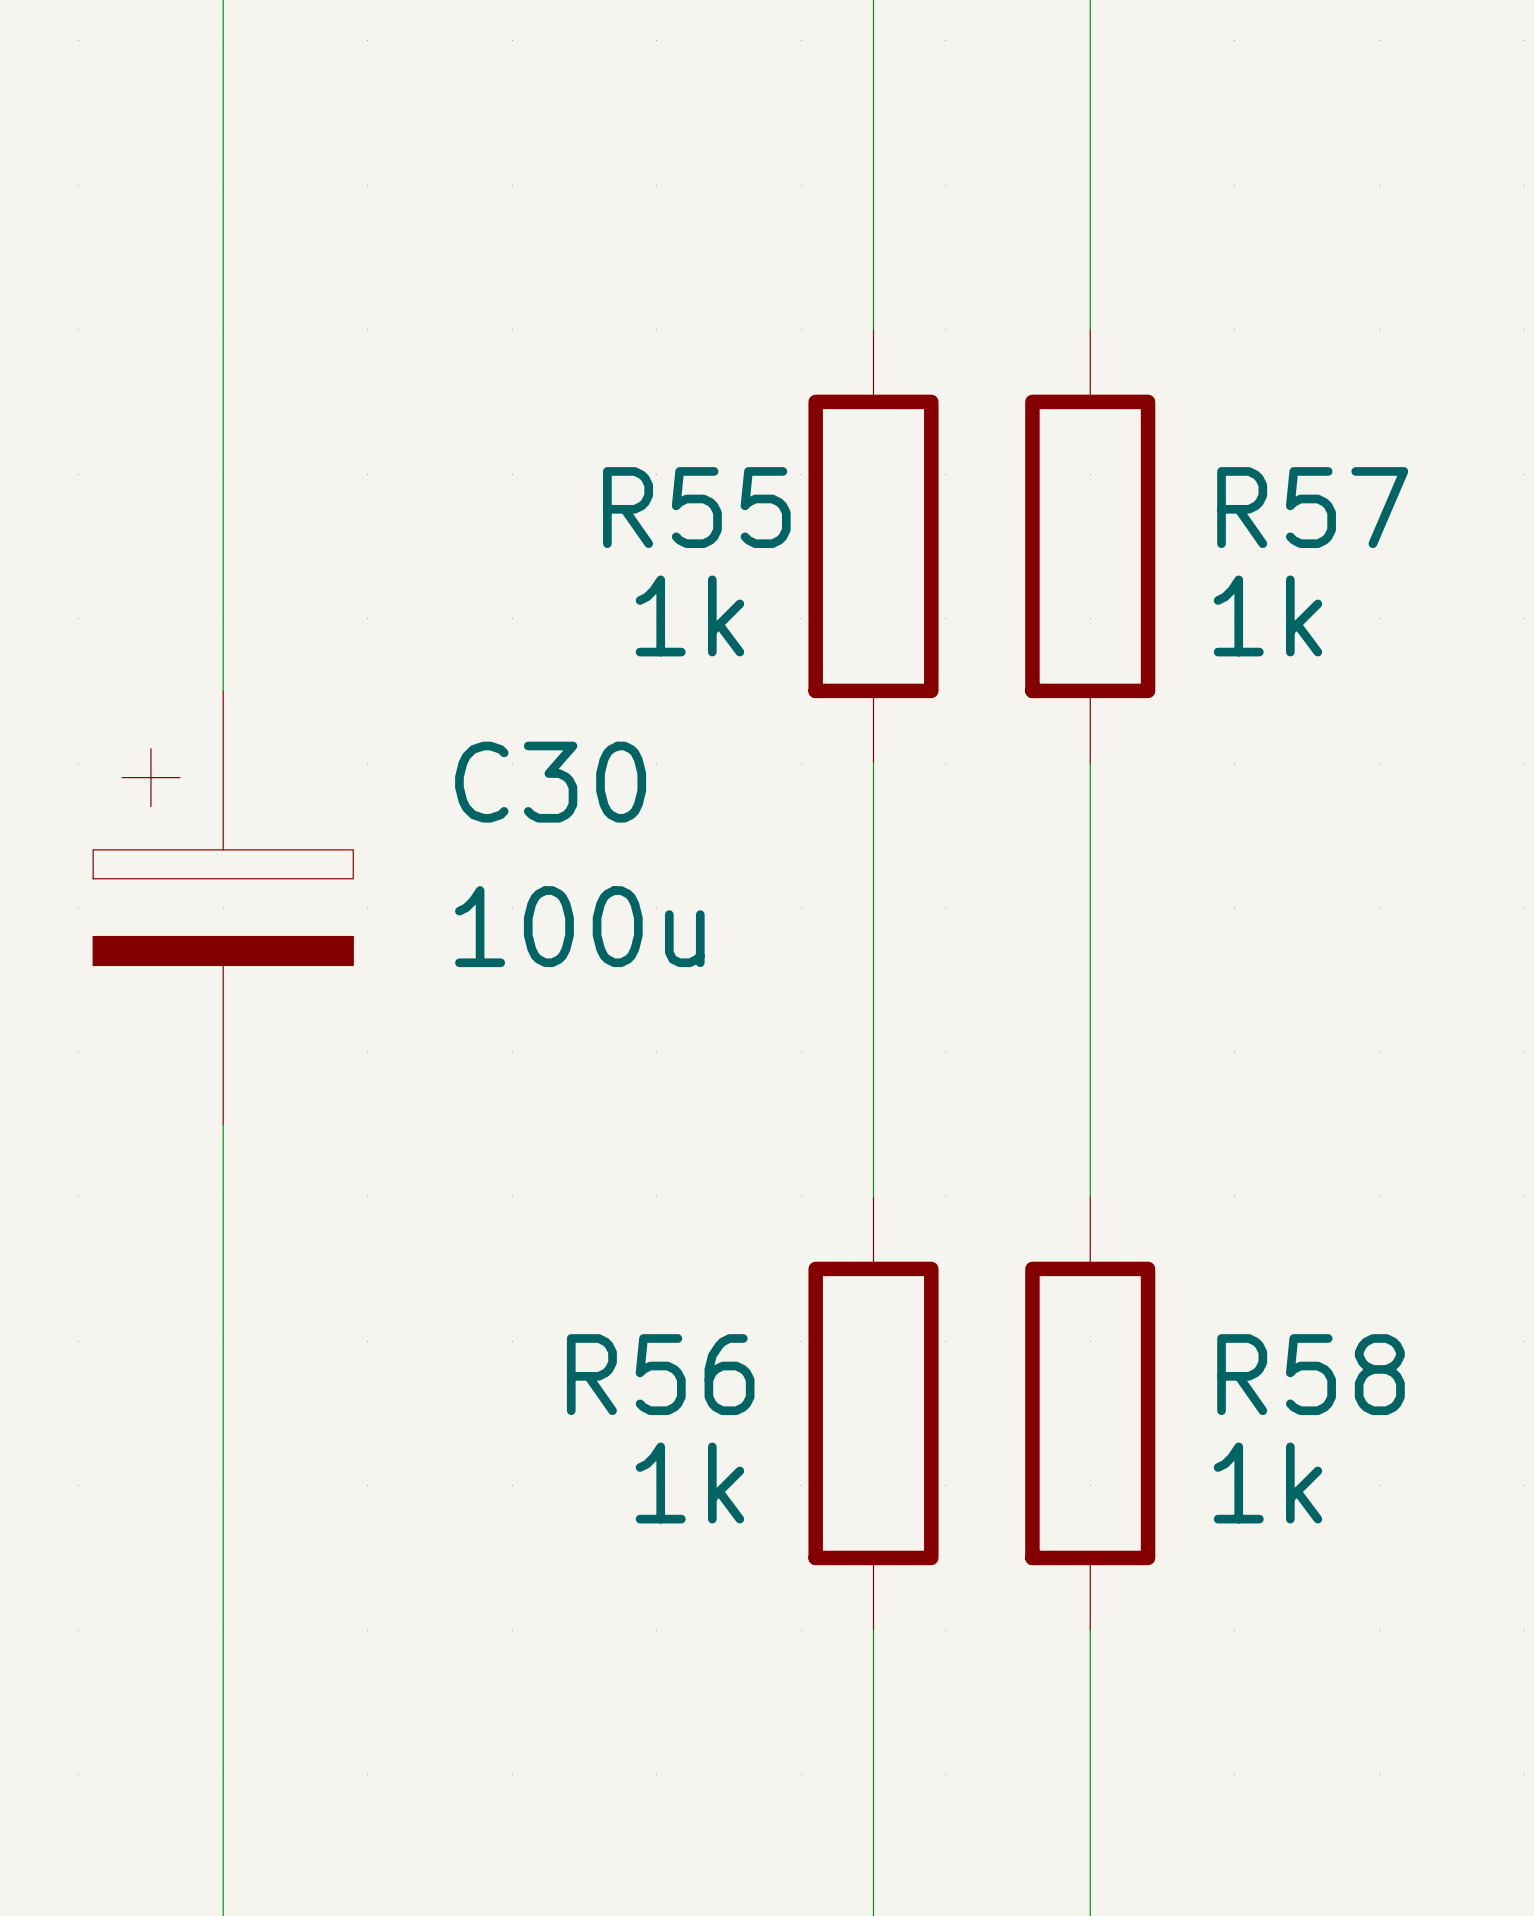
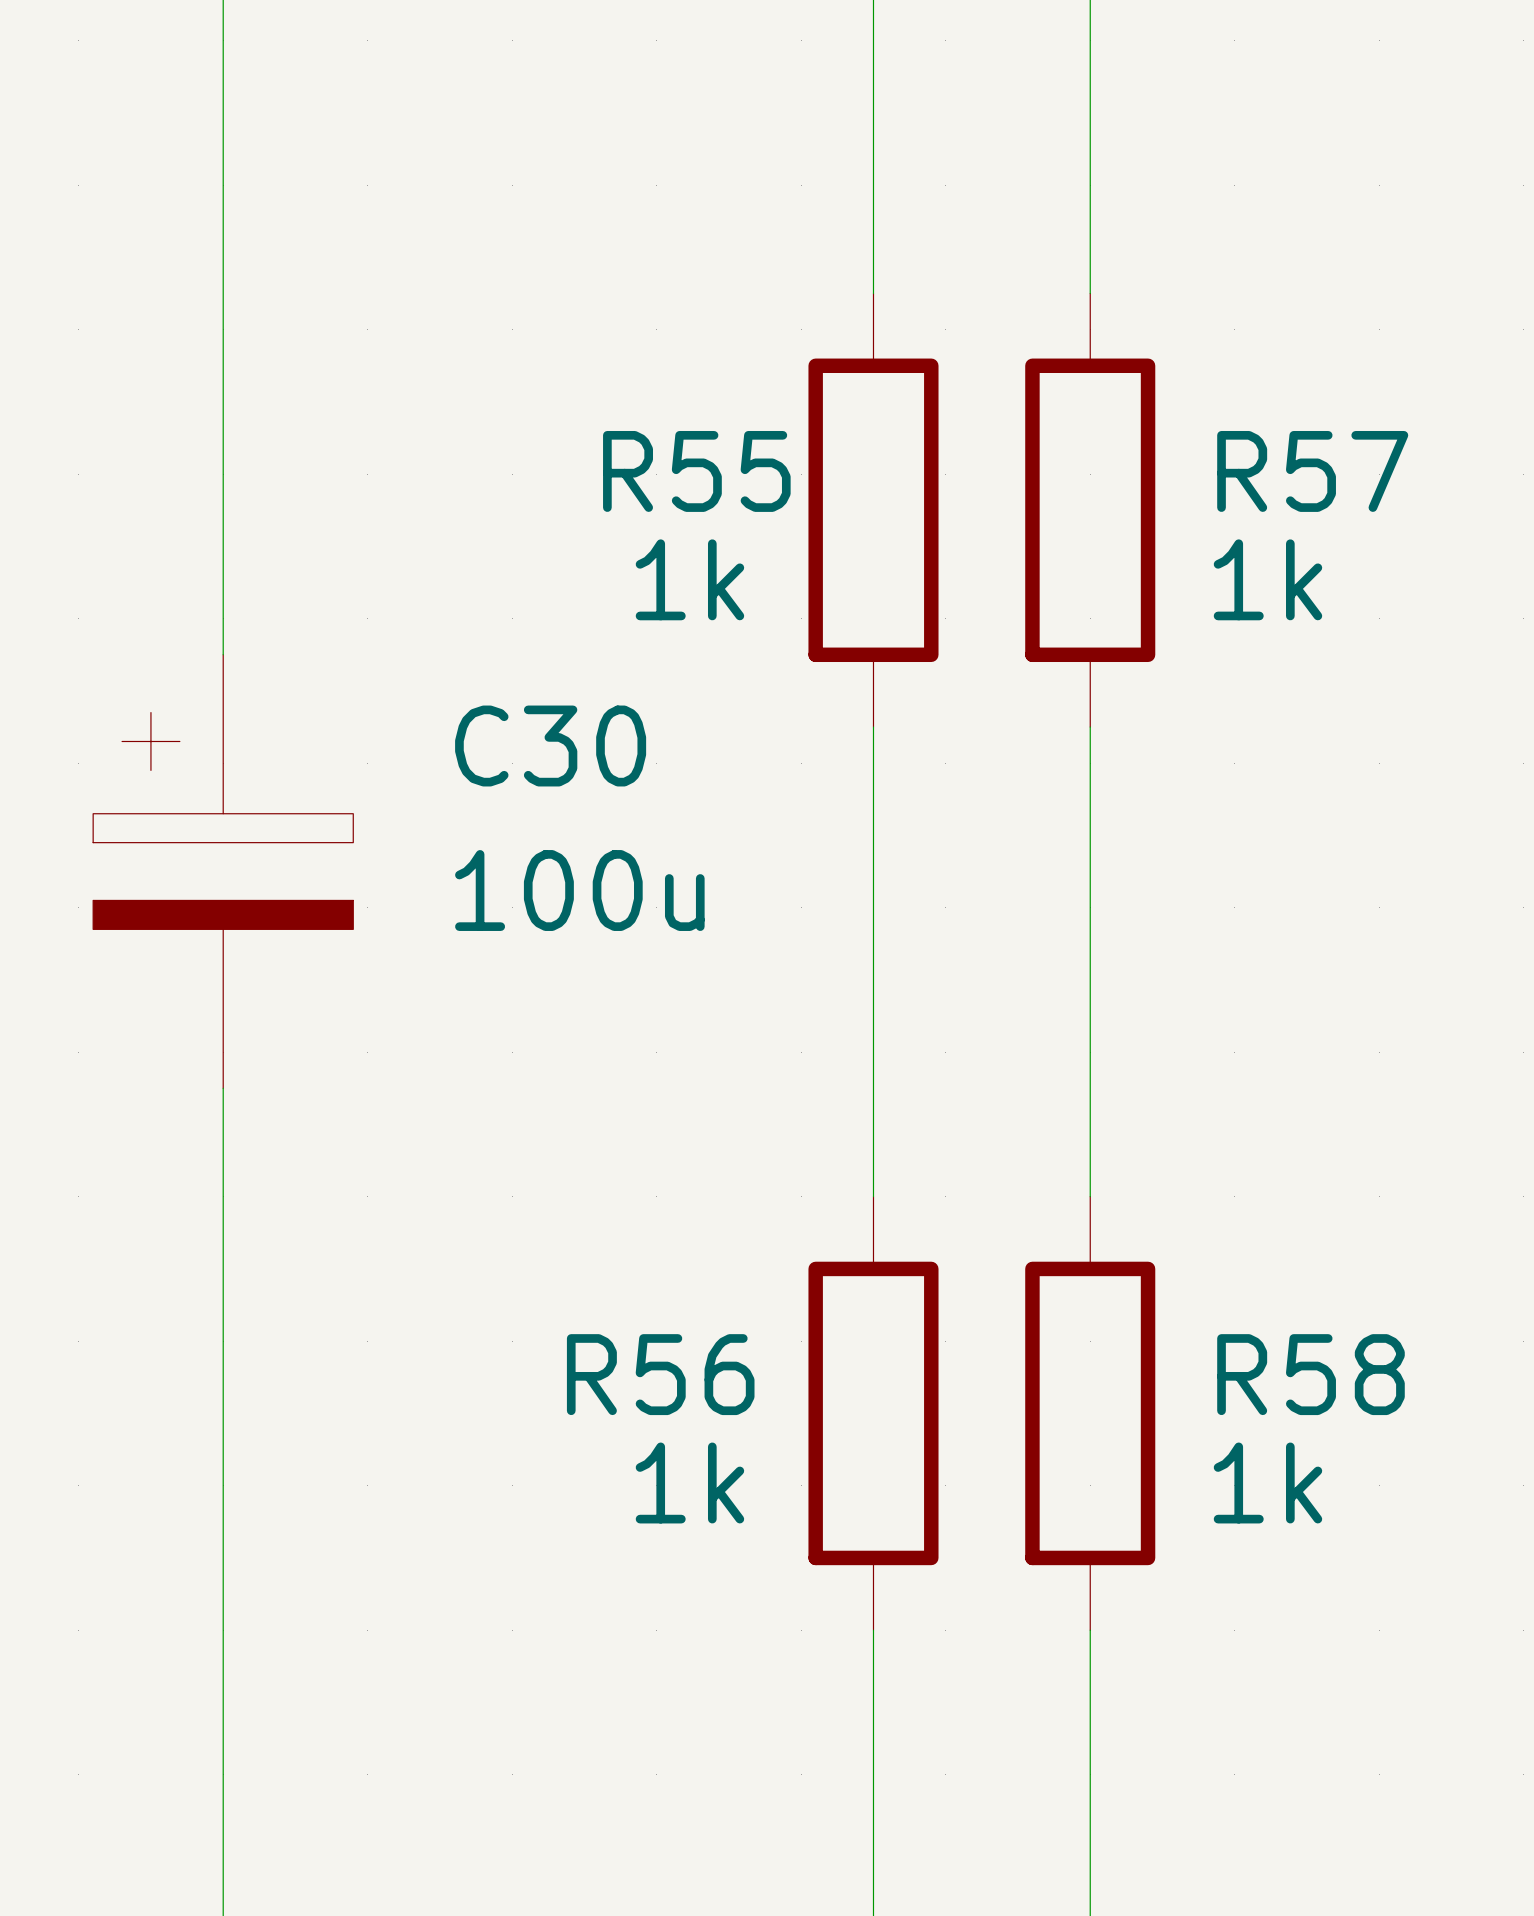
R55 position: (873, 546) -> (873, 510)
R57 position: (1090, 546) -> (1090, 510)
C30 position: (223, 907) -> (223, 871)

